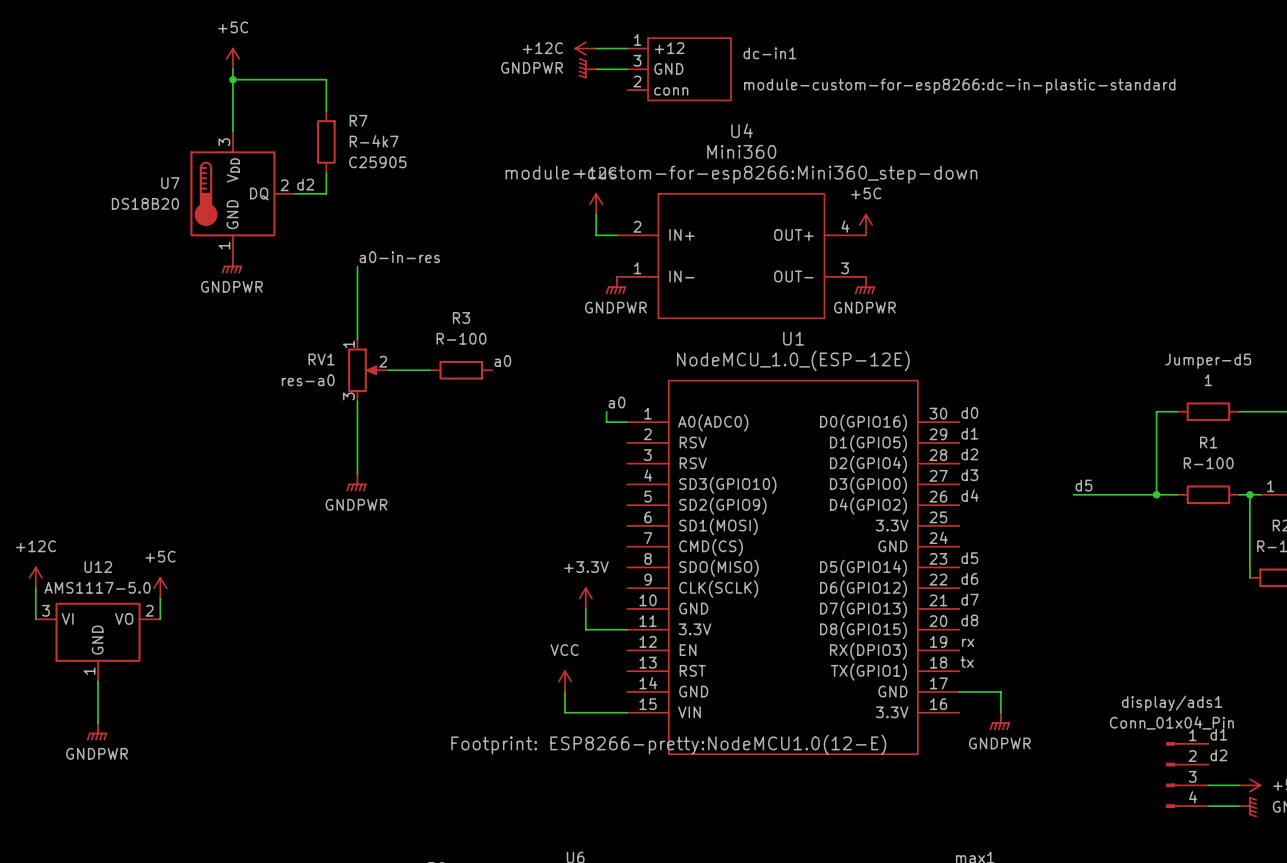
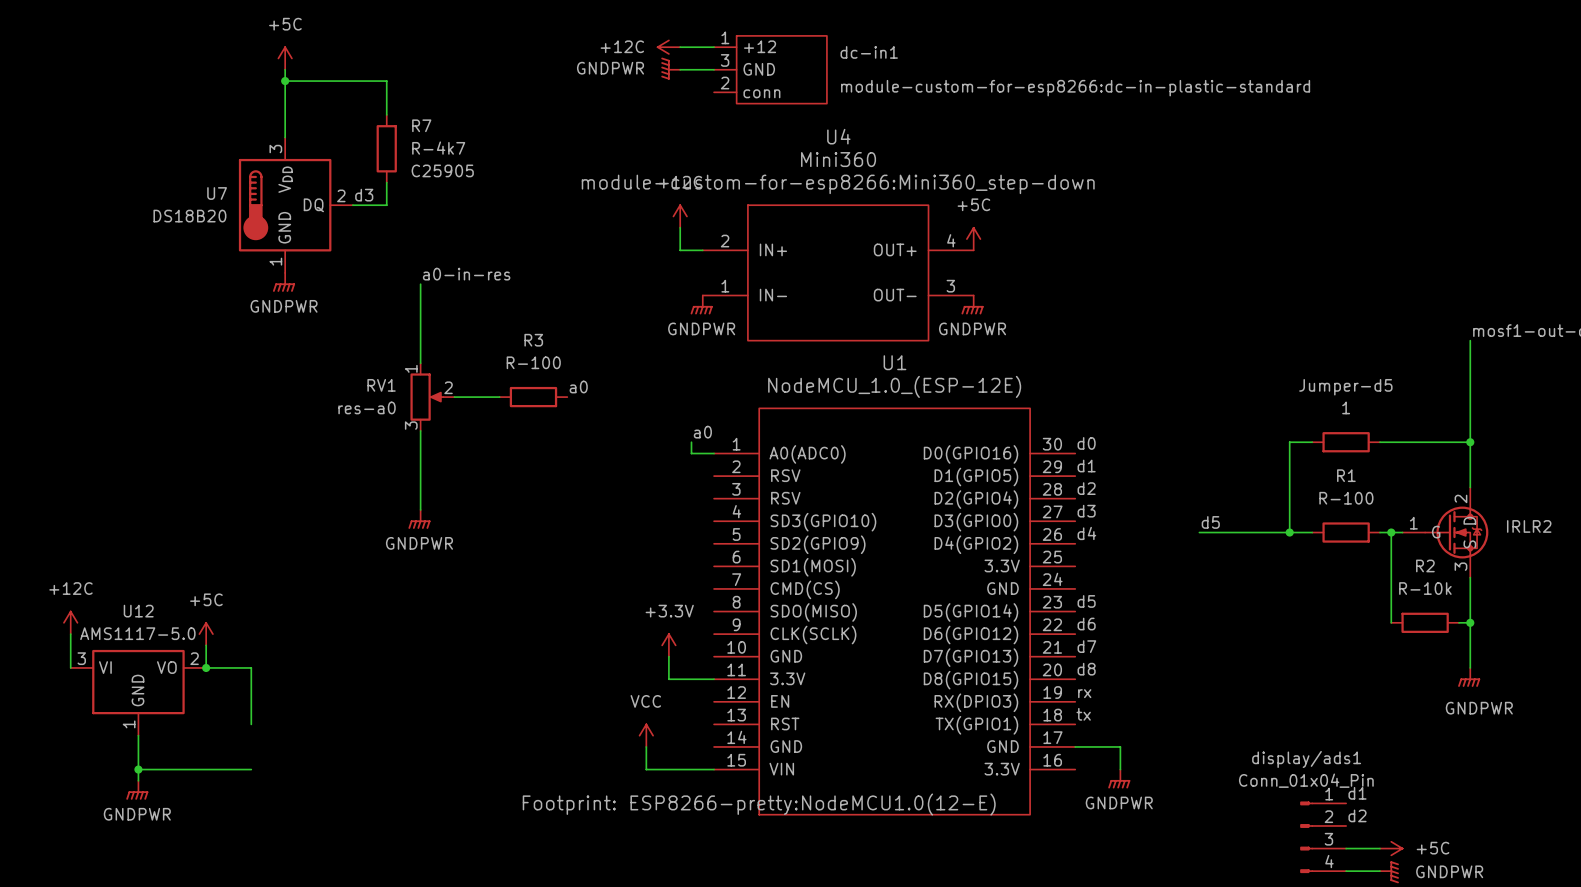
label: d2 (305, 184) -> d3 (364, 195)
wire: none -> (206, 667) (251, 667) (251, 724)
junction: none -> (206, 667)
wire: none -> (138, 769) (251, 769)
junction: none -> (138, 769)

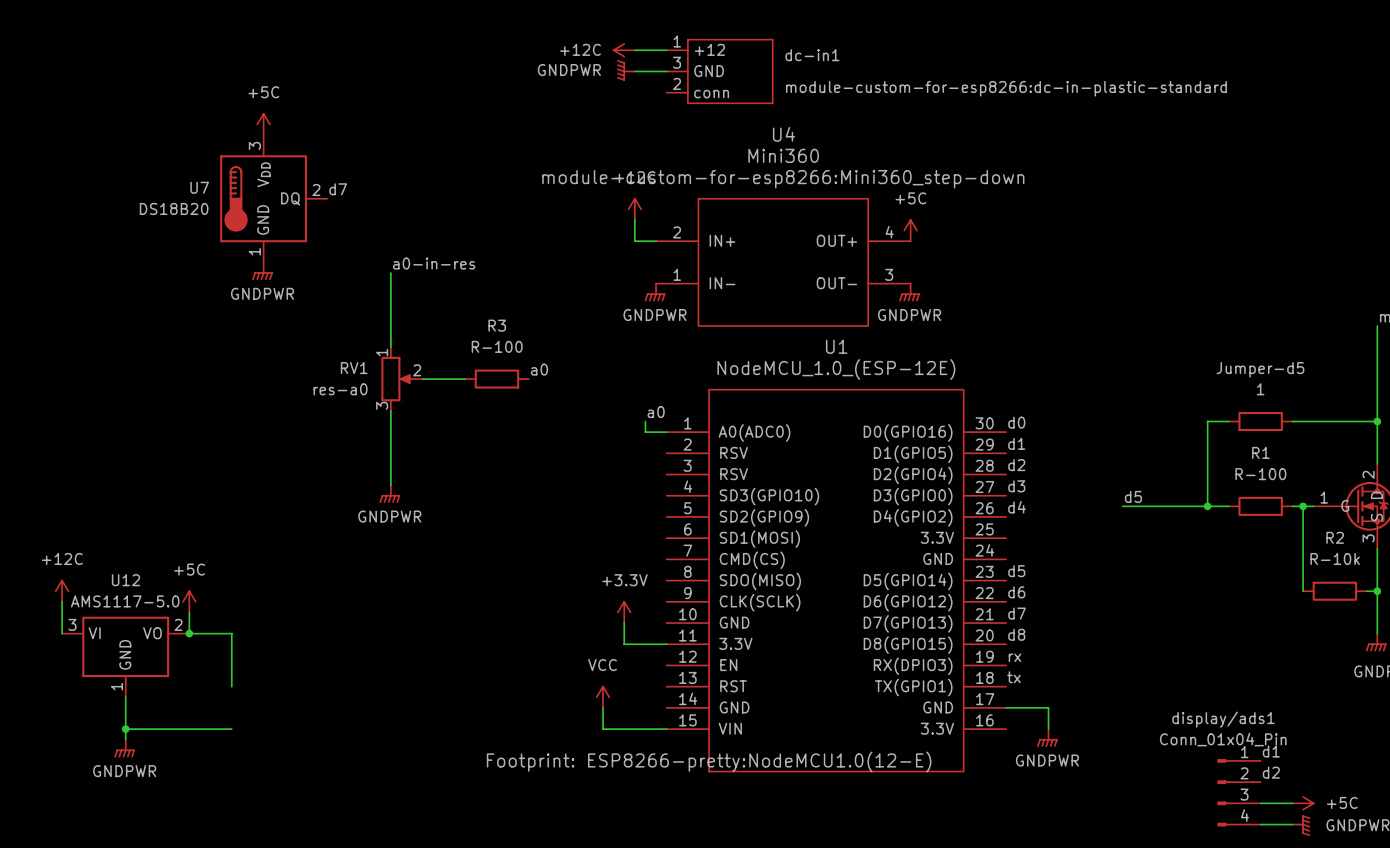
power symbol position: +5C (285, 58) -> +5C (263, 124)
wire: (285, 69) (285, 137) -> none
wire: (285, 81) (386, 81) (386, 114) -> none
junction: (285, 81) -> none
R7: R-4k7 (386, 148) -> none
wire: (386, 182) (386, 205) (352, 205) -> none
label: d3 (364, 195) -> d7 (338, 189)

